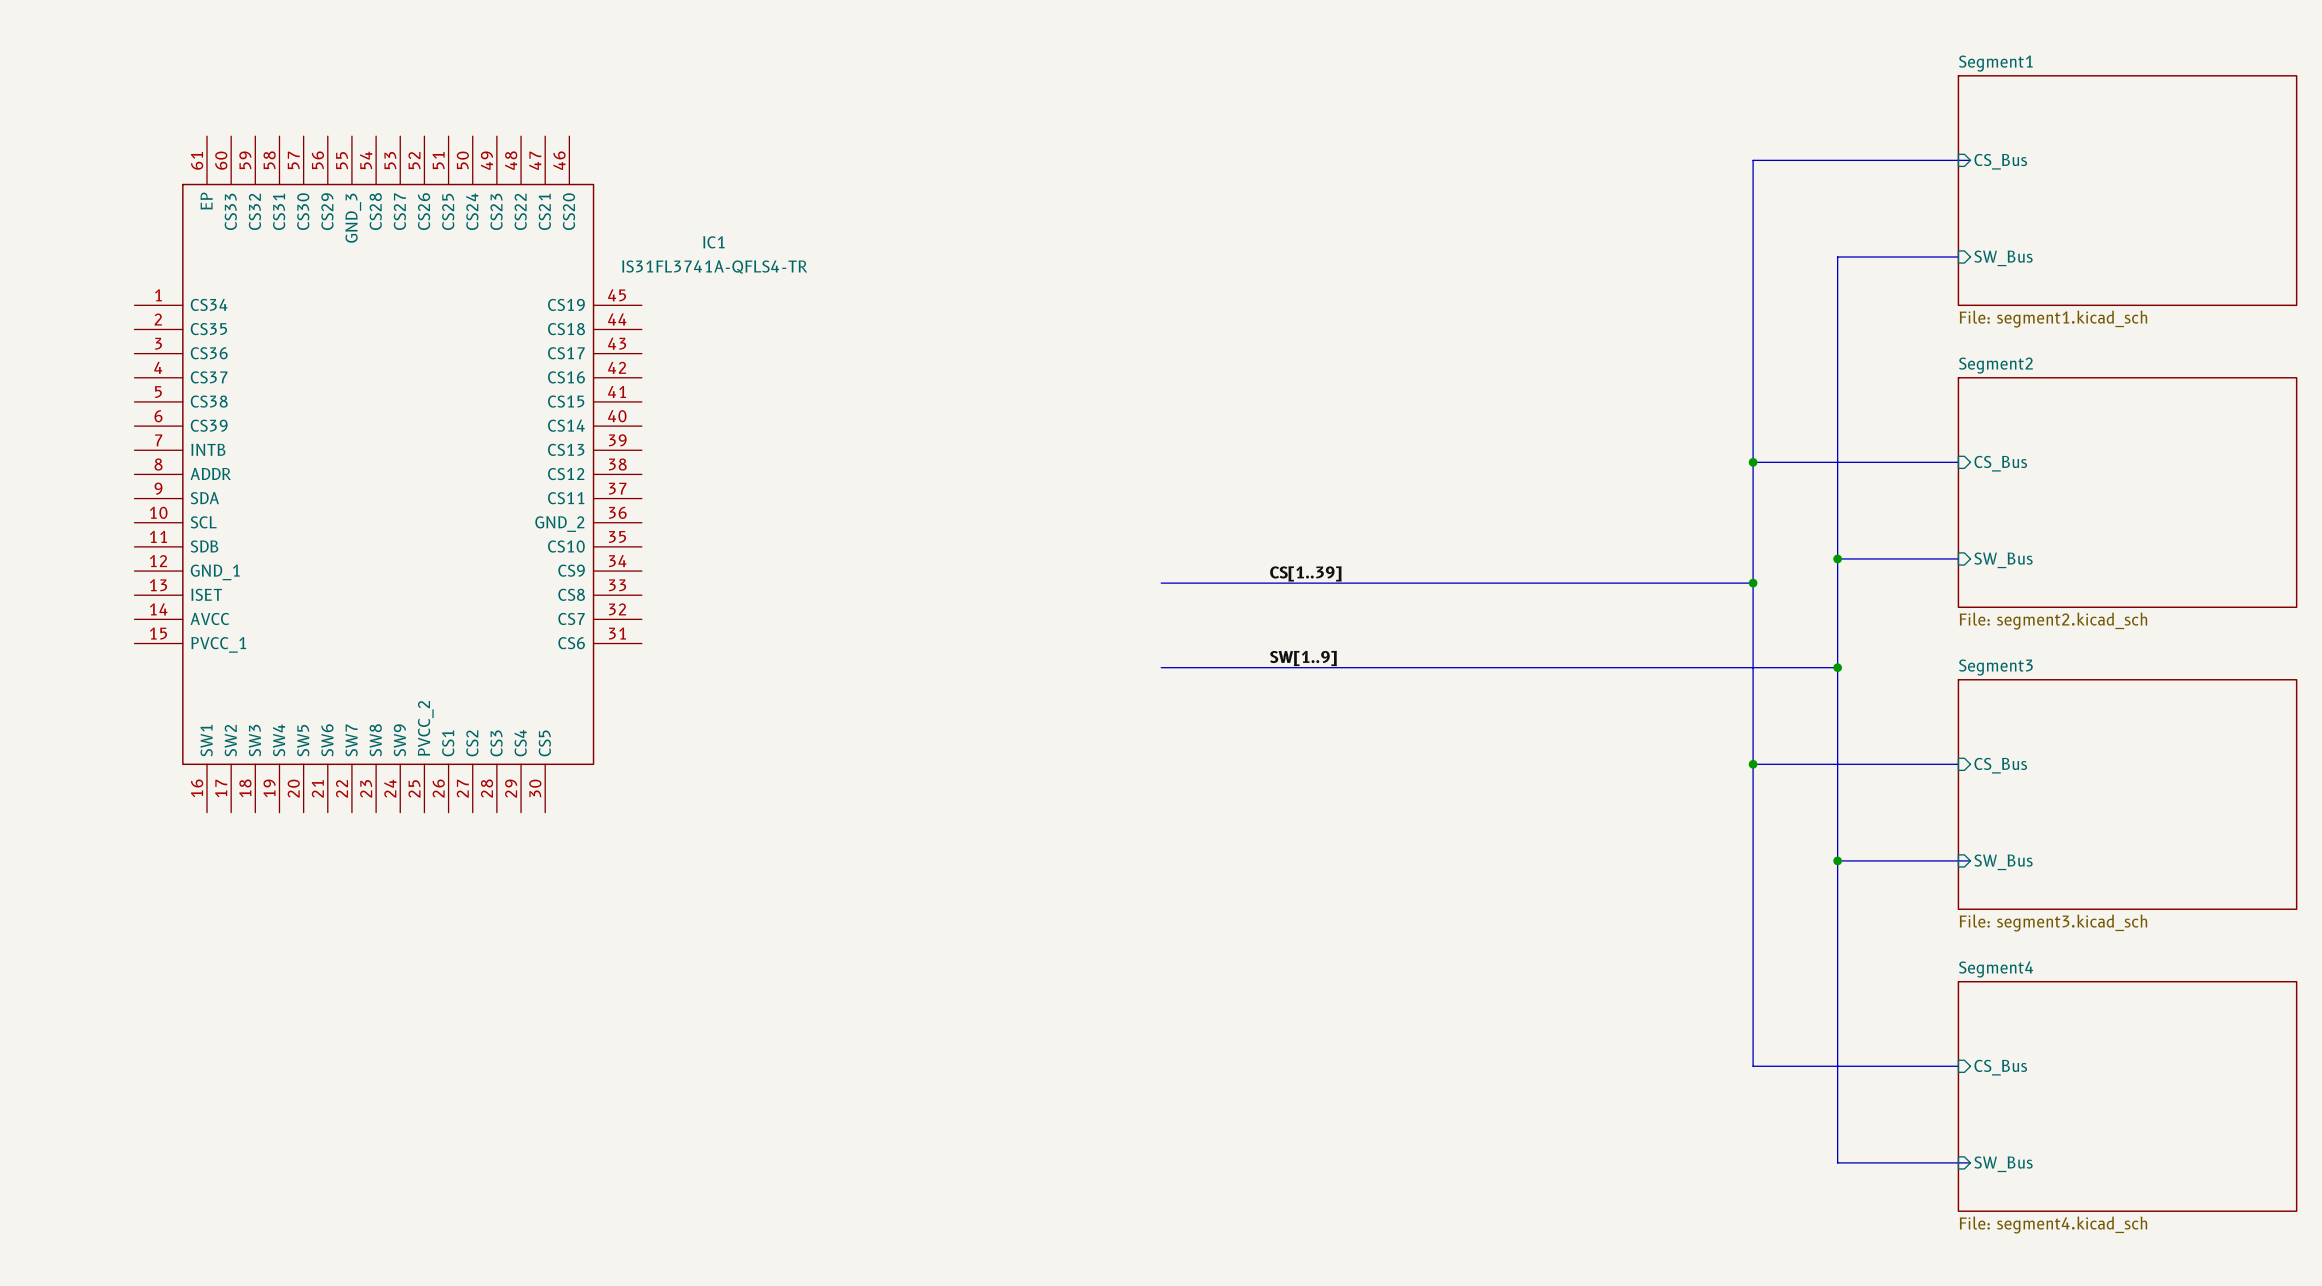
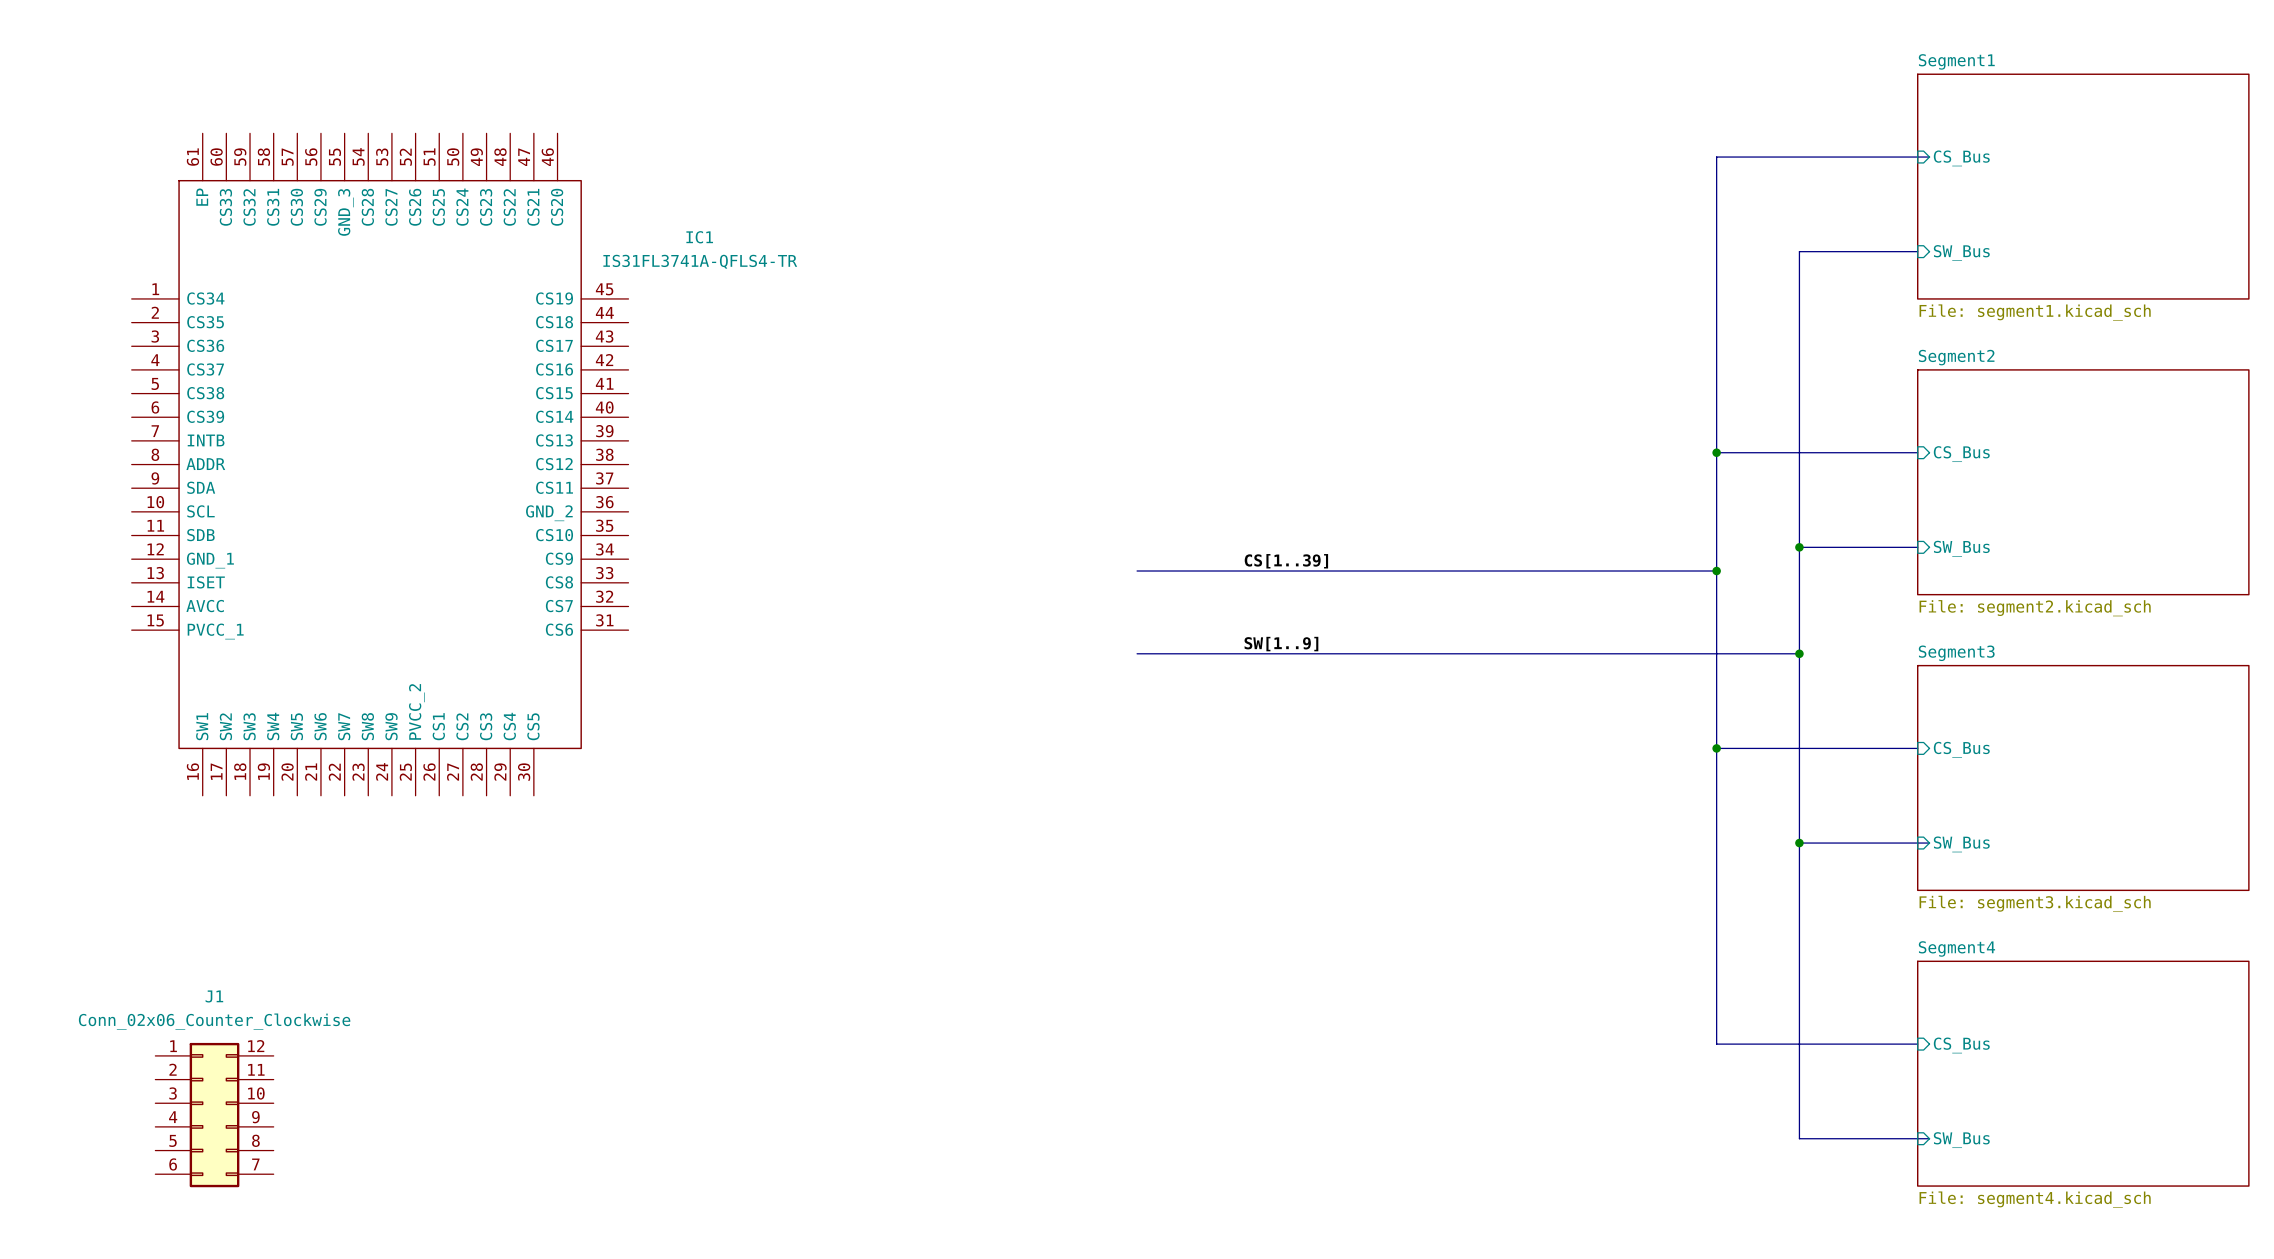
J1: none -> Conn_02x06_Counter_Clockwise (214, 1115)

